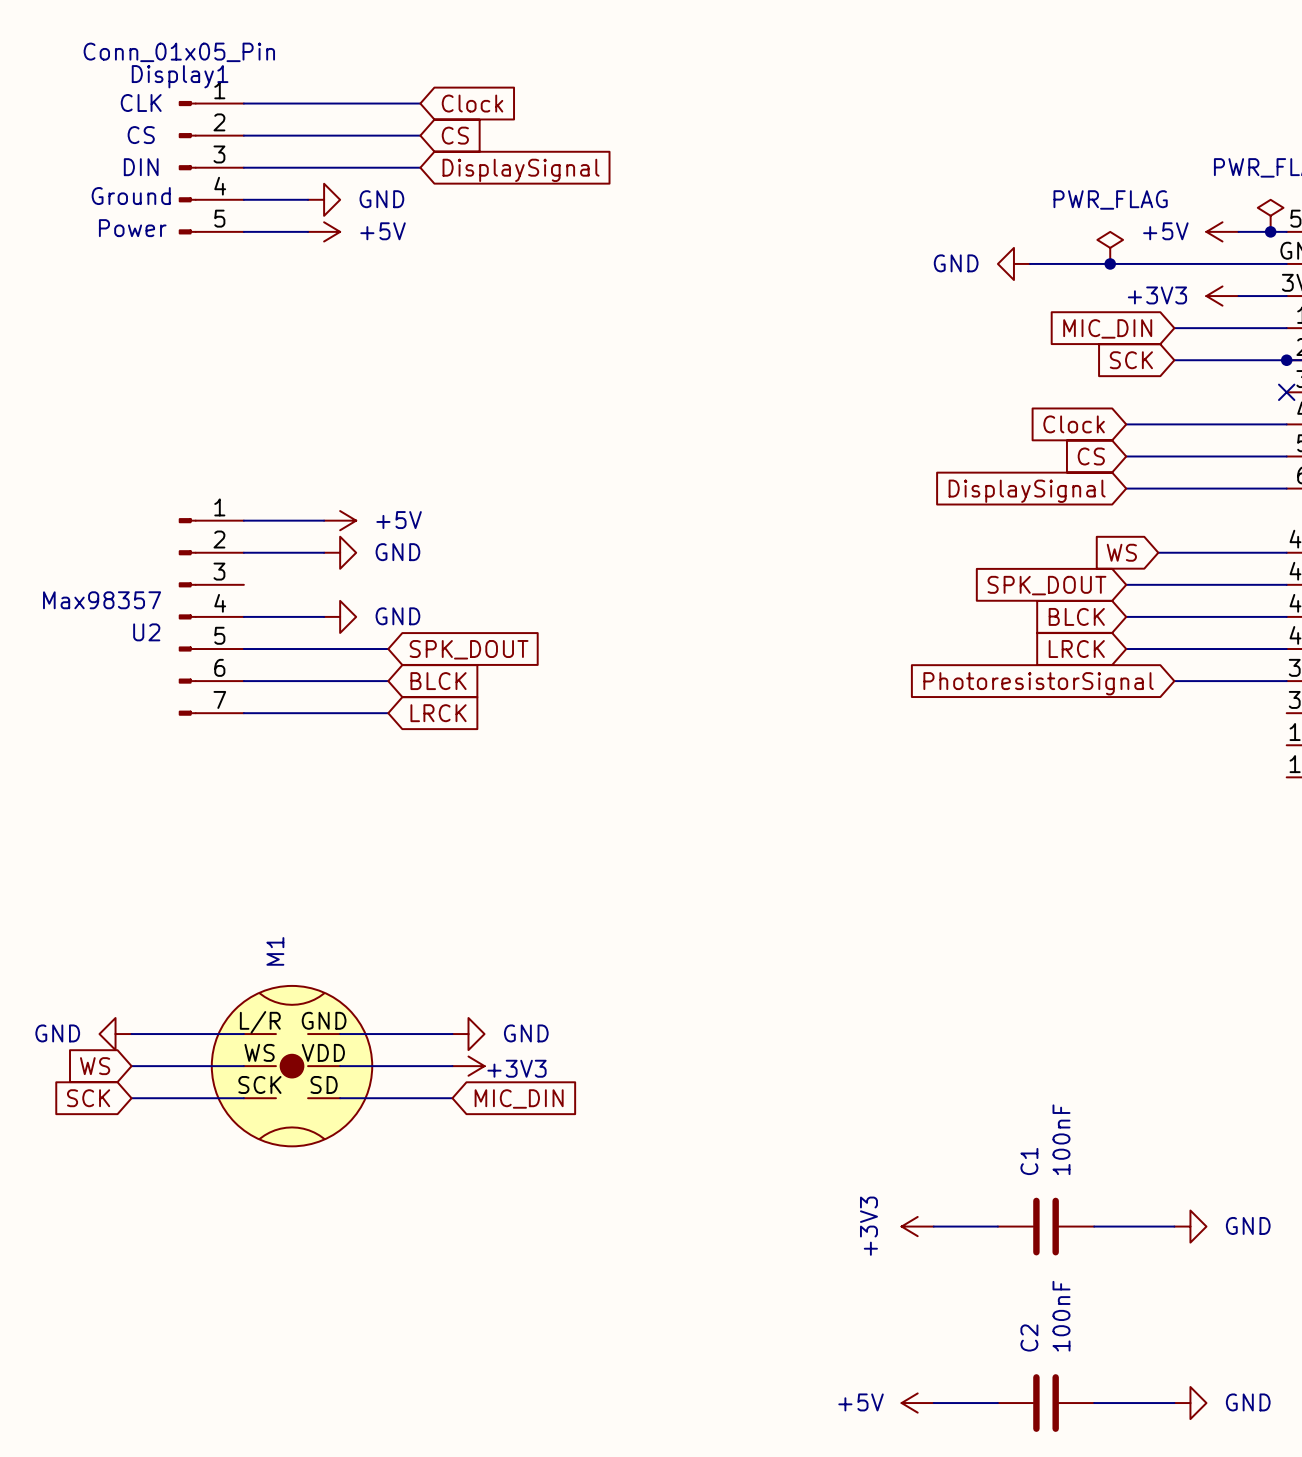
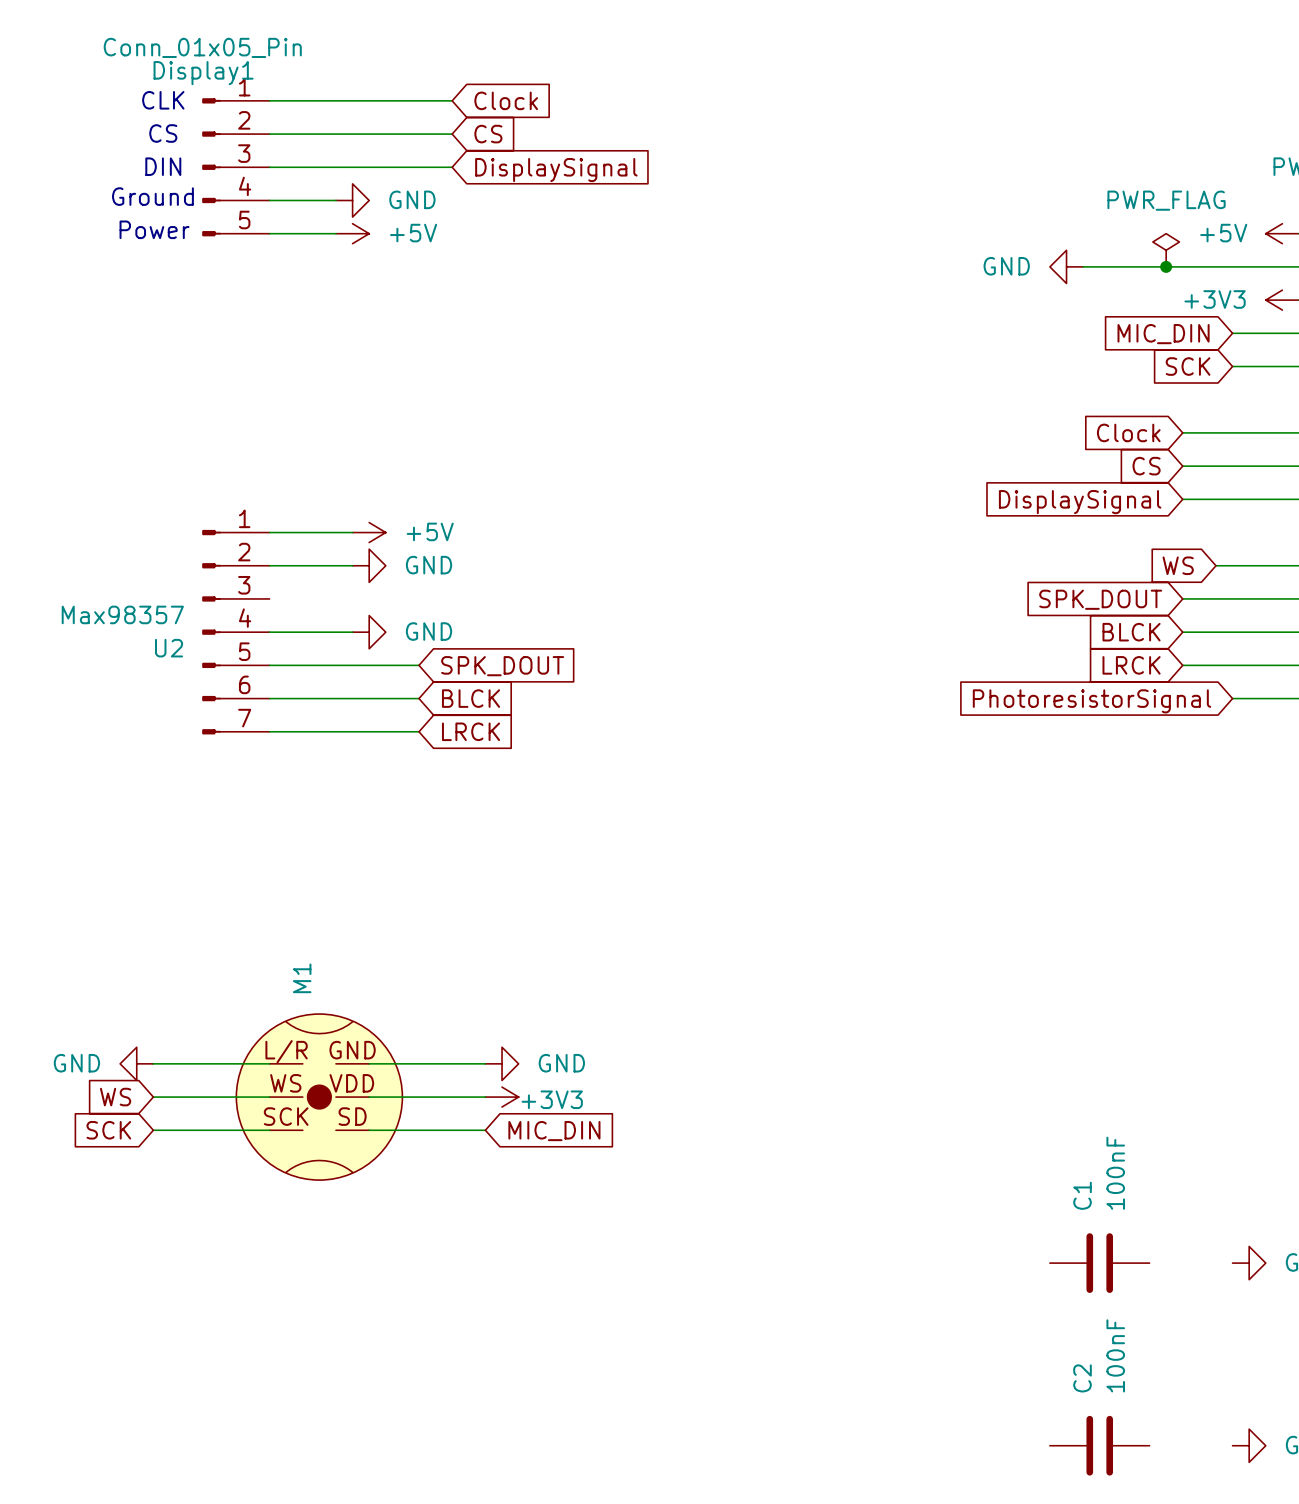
power symbol: +3V3 (917, 1226) -> none
wire: (933, 1226) (997, 1226) -> none
wire: (1094, 1226) (1174, 1226) -> none
power symbol: +5V (917, 1403) -> none
wire: (933, 1403) (997, 1403) -> none
wire: (1094, 1403) (1174, 1403) -> none

